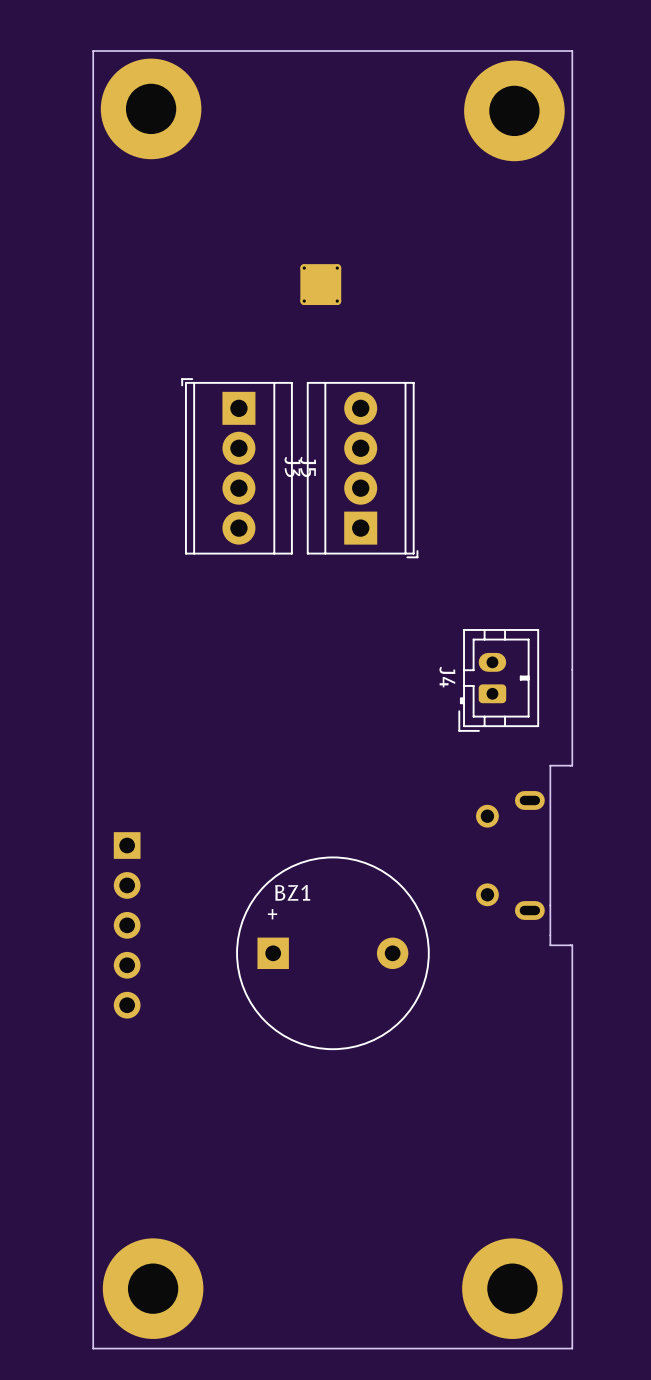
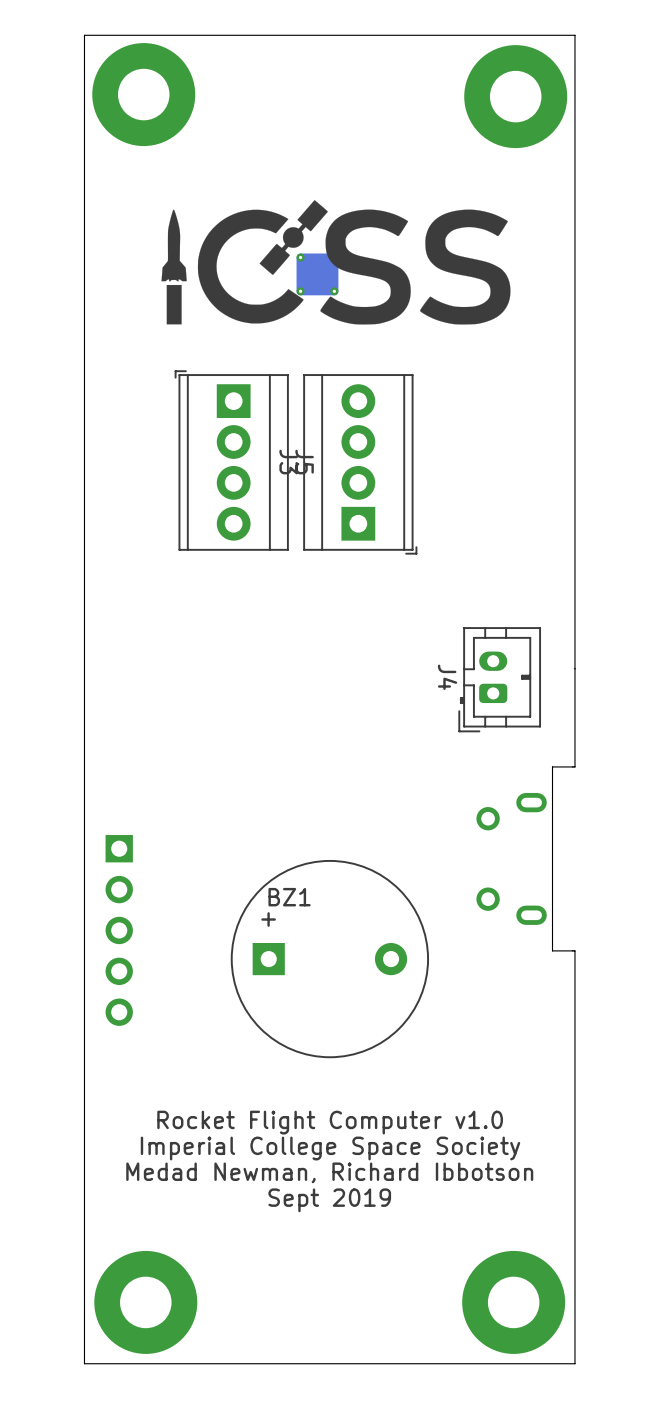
drawing: none -> [161, 200, 511, 325]
text: none -> Rocket Flight Computer v1.0 (330, 1122)
text: none -> Imperial College Space Society (330, 1148)
text: none -> Medad Newman, Richard Ibbotson (329, 1172)
text: none -> Sept 2019 (329, 1200)

